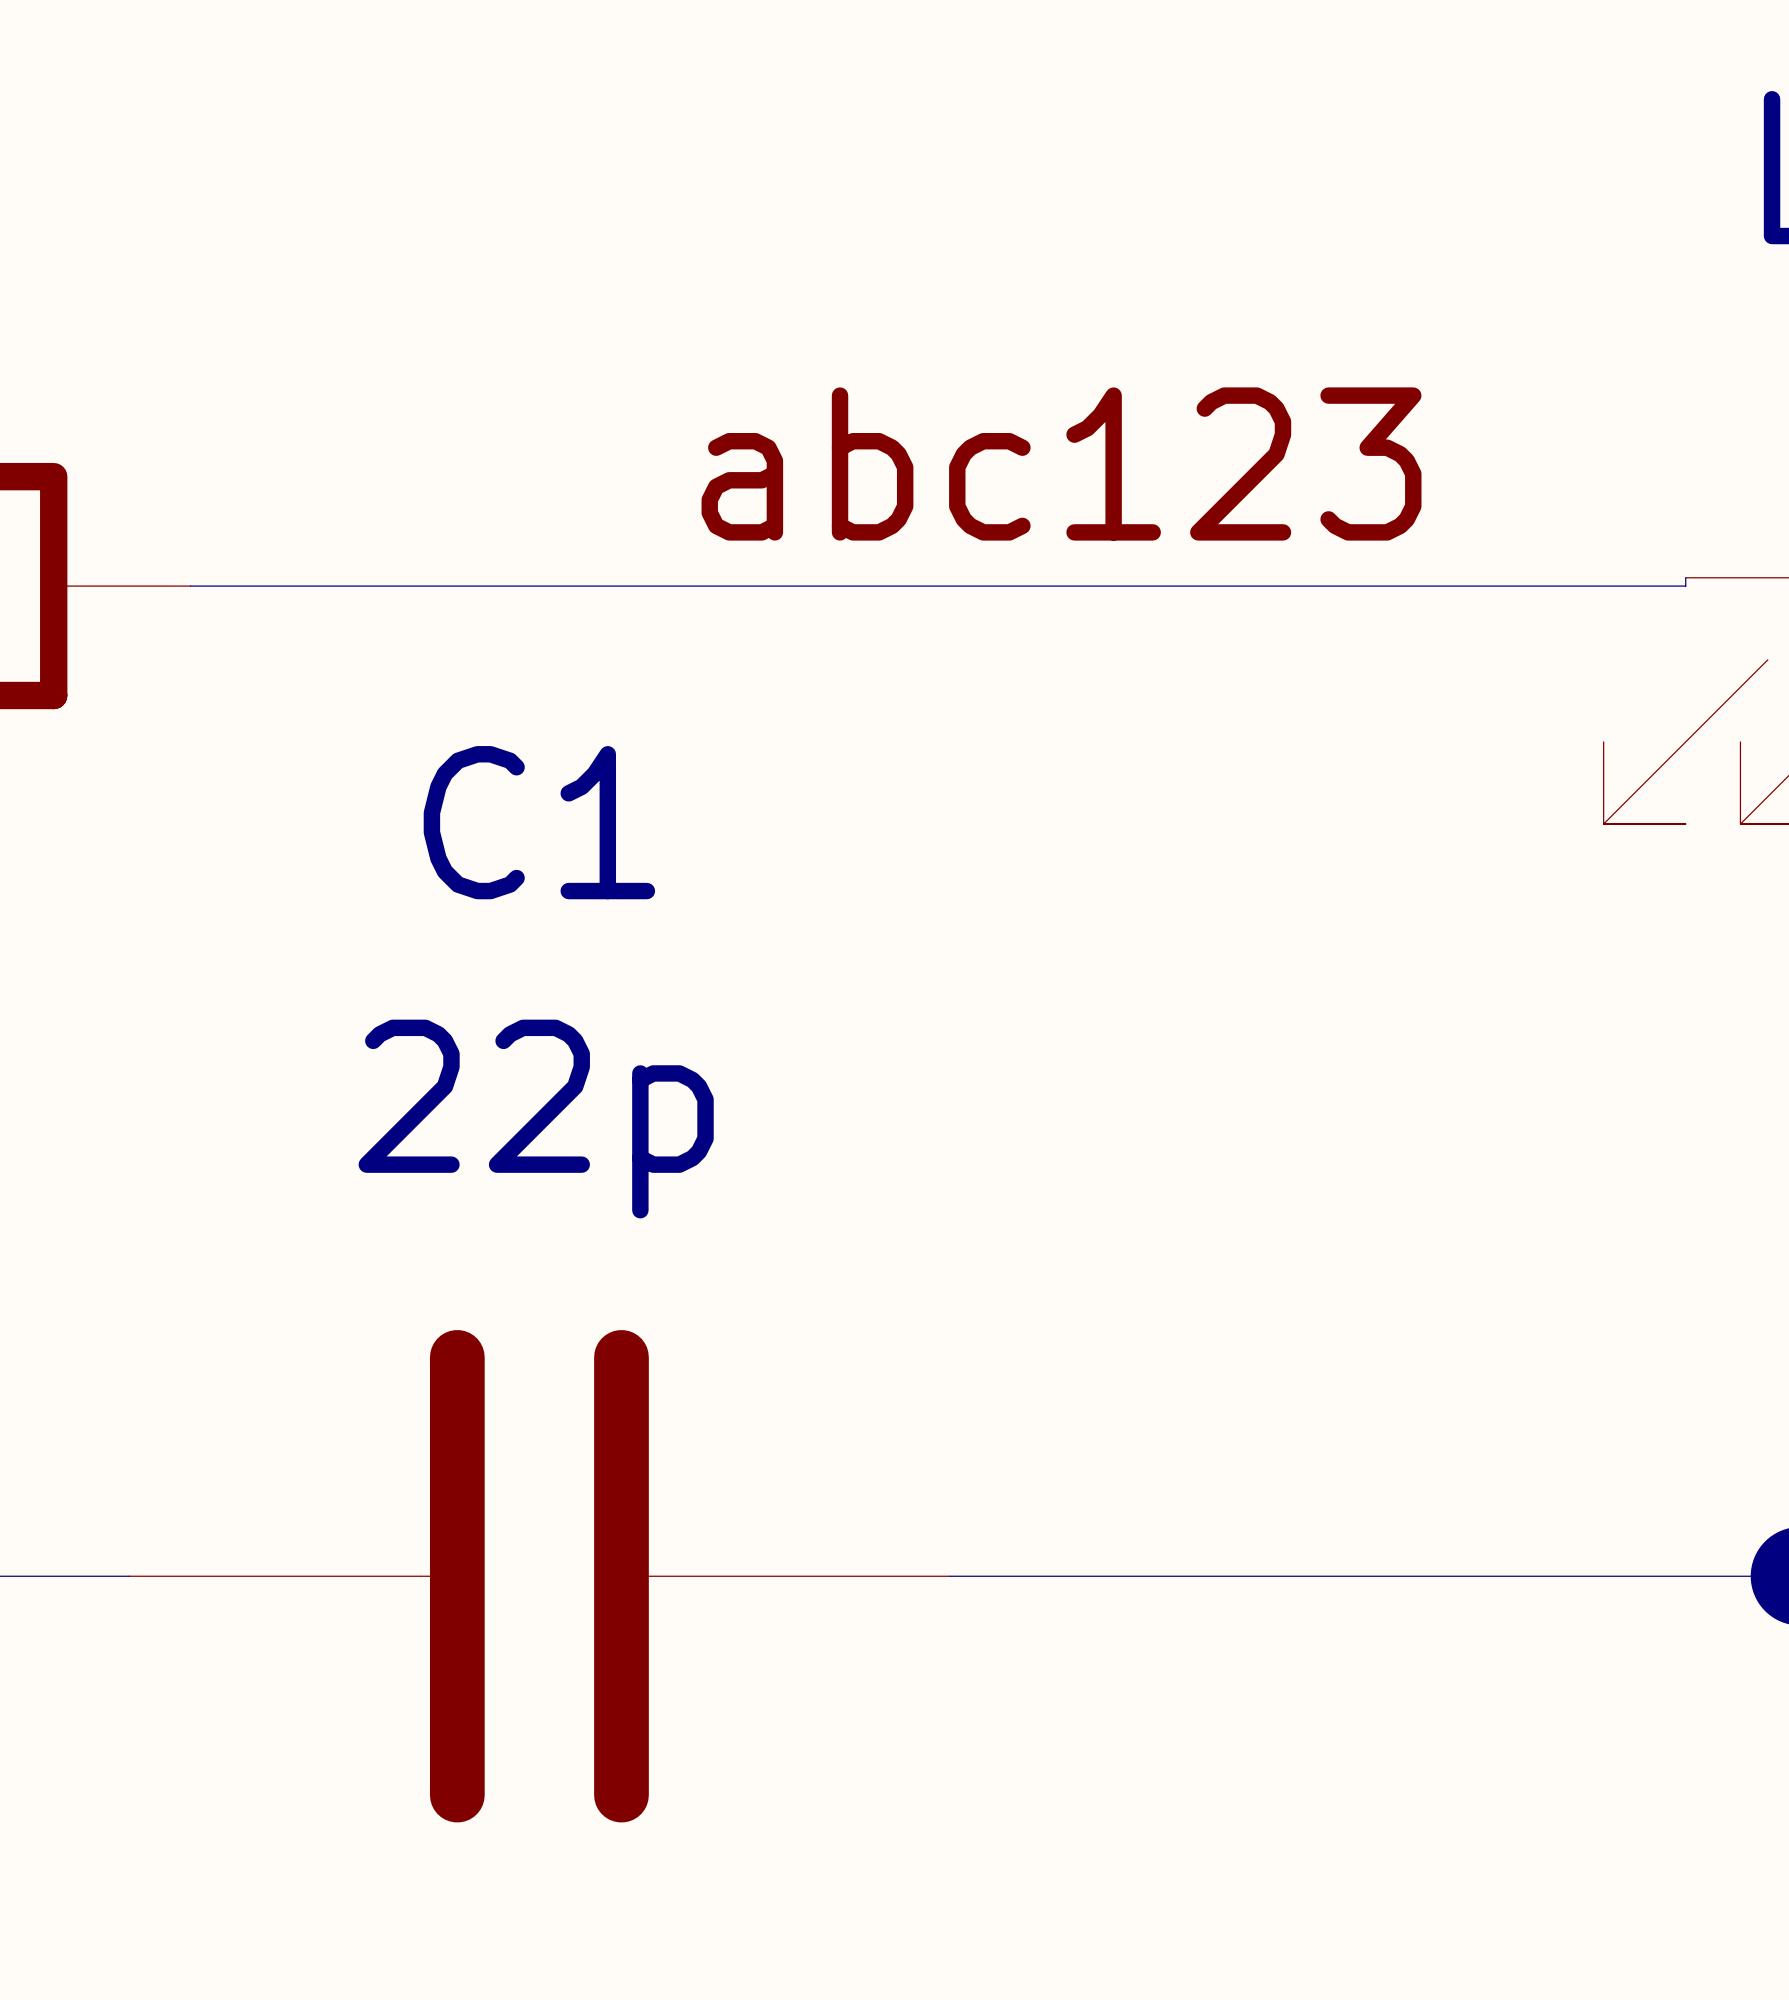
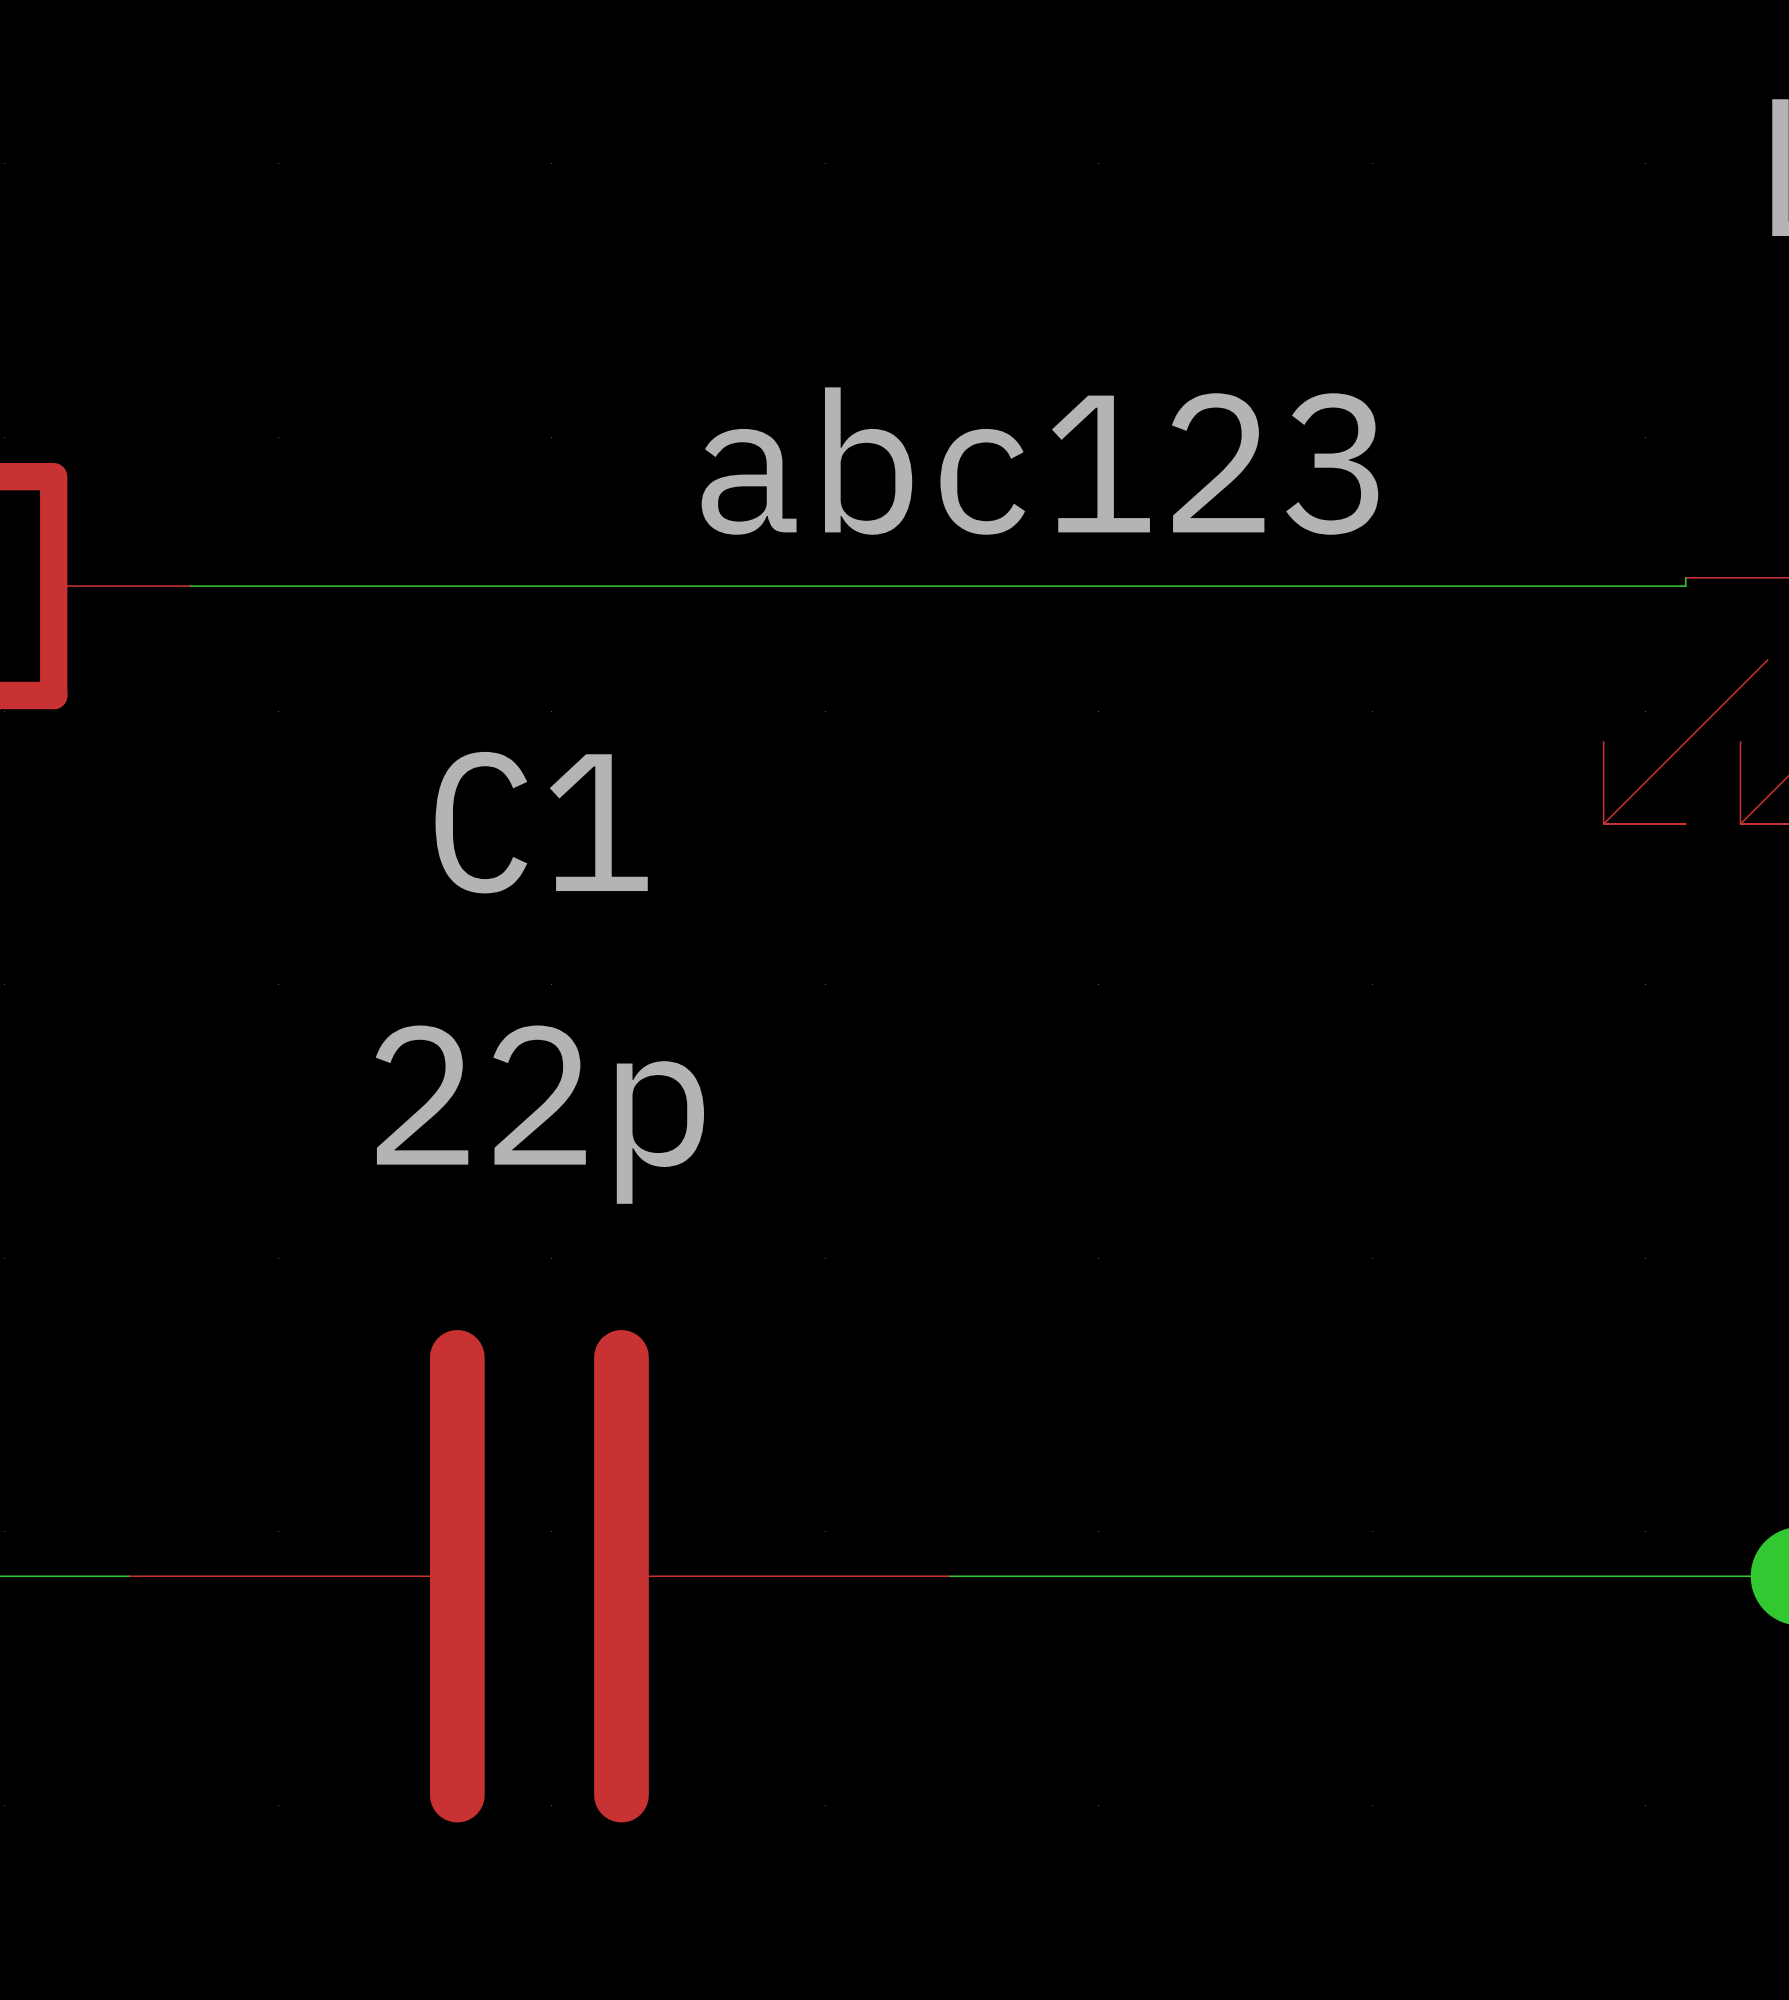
label position: abc123 (1061, 464) -> abc123 (1039, 461)

